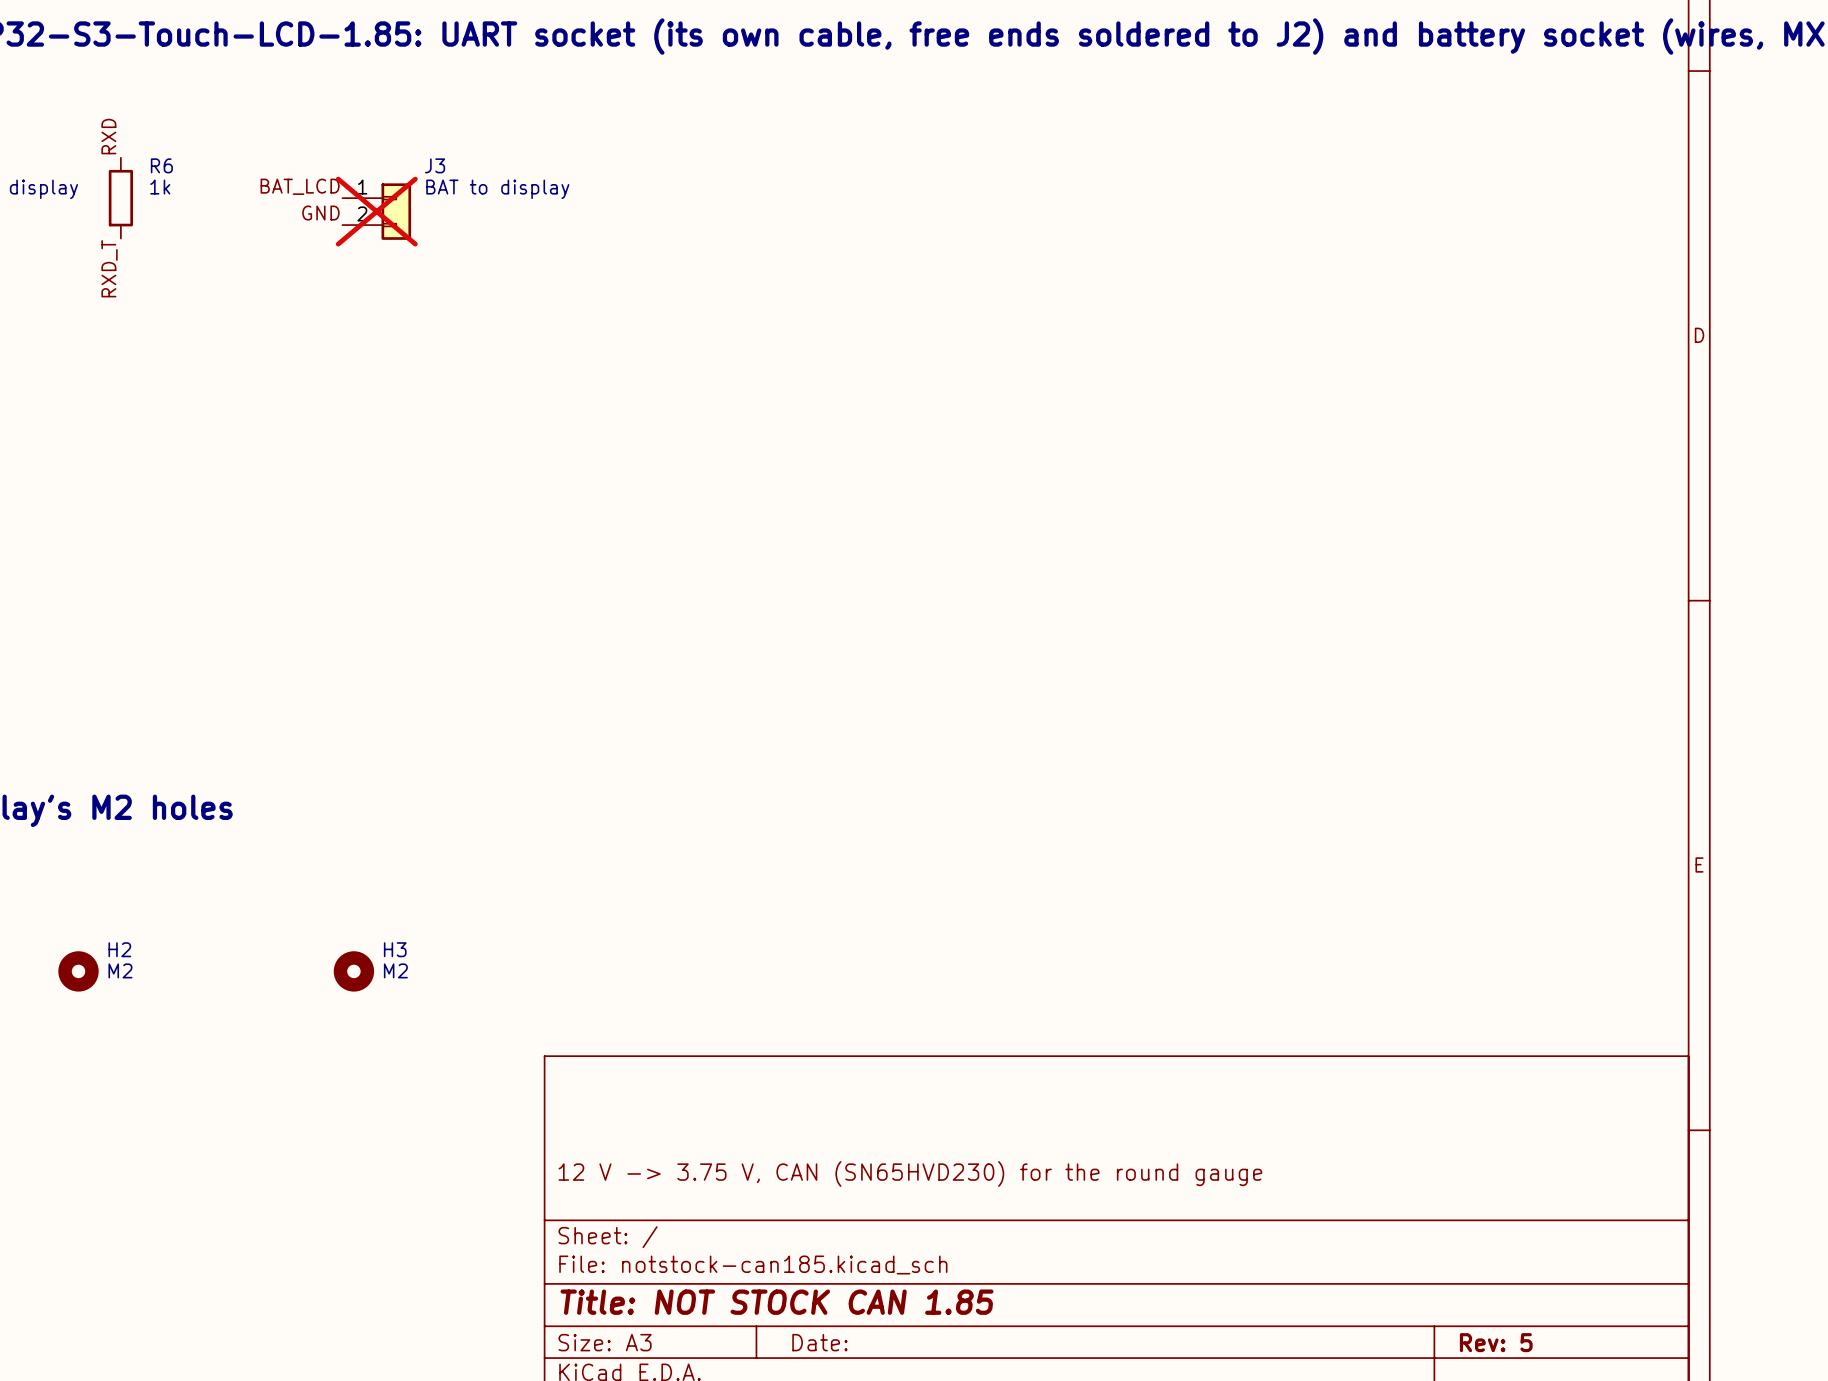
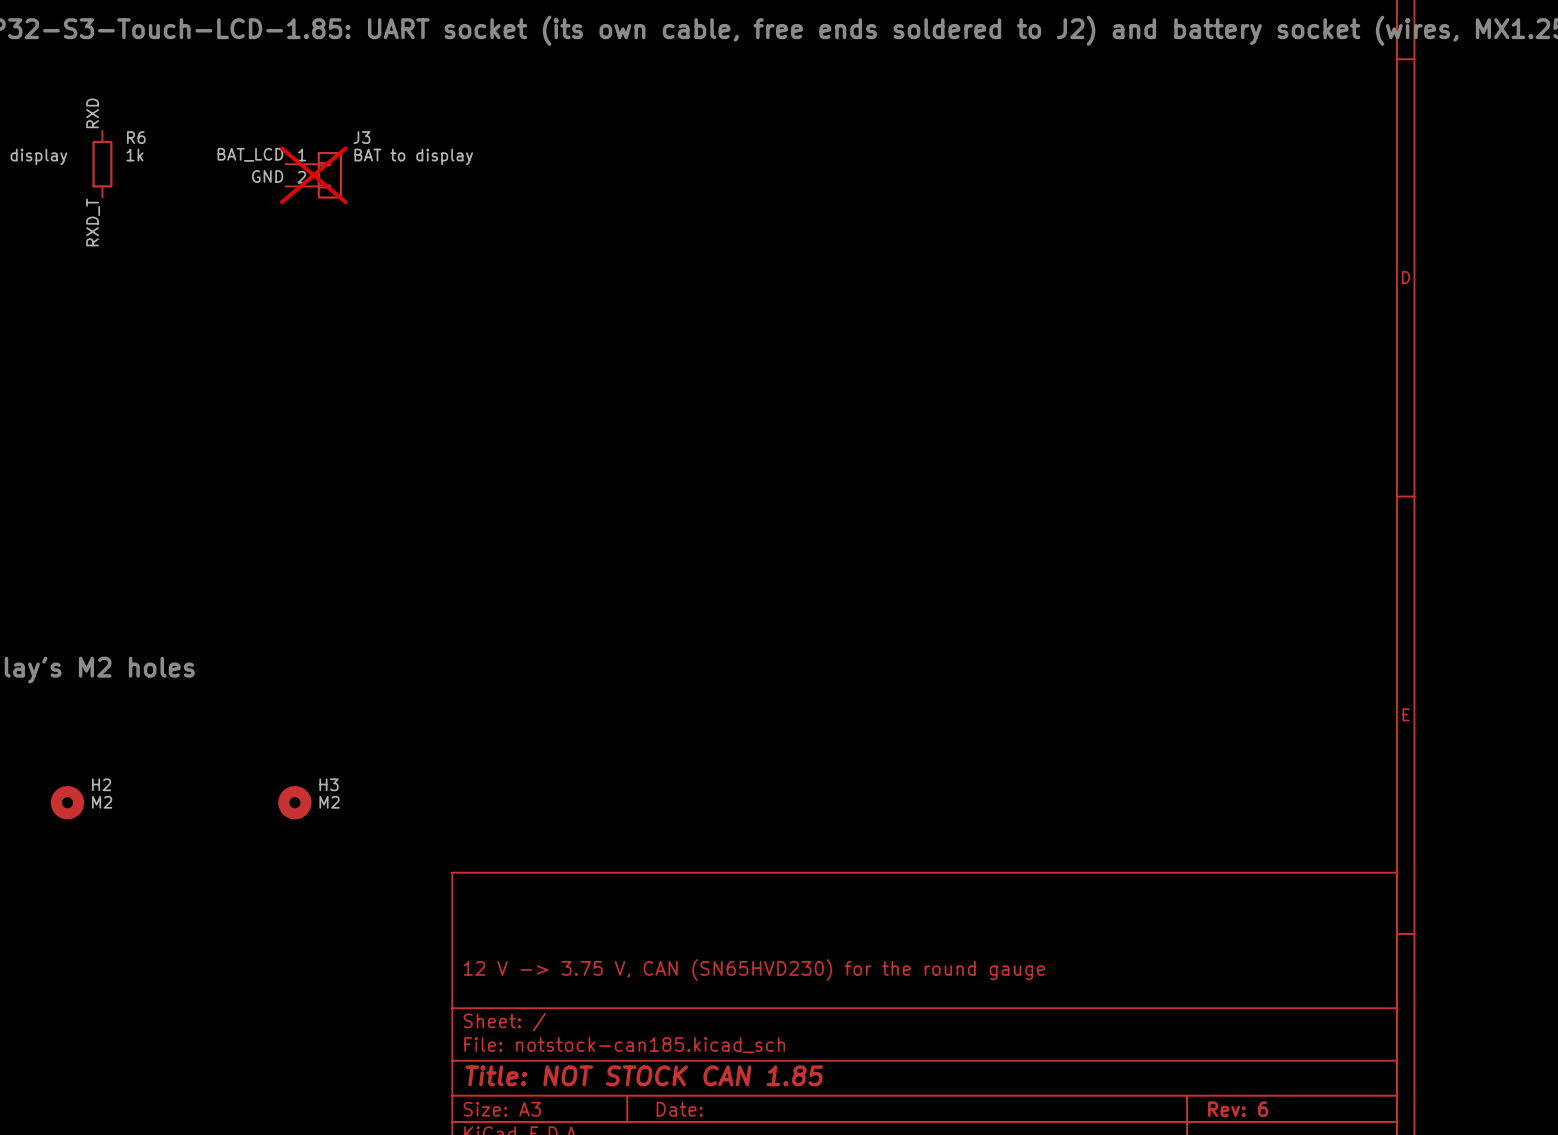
title block: Rev: 5 (1496, 1342) -> Rev: 6 (1238, 1109)

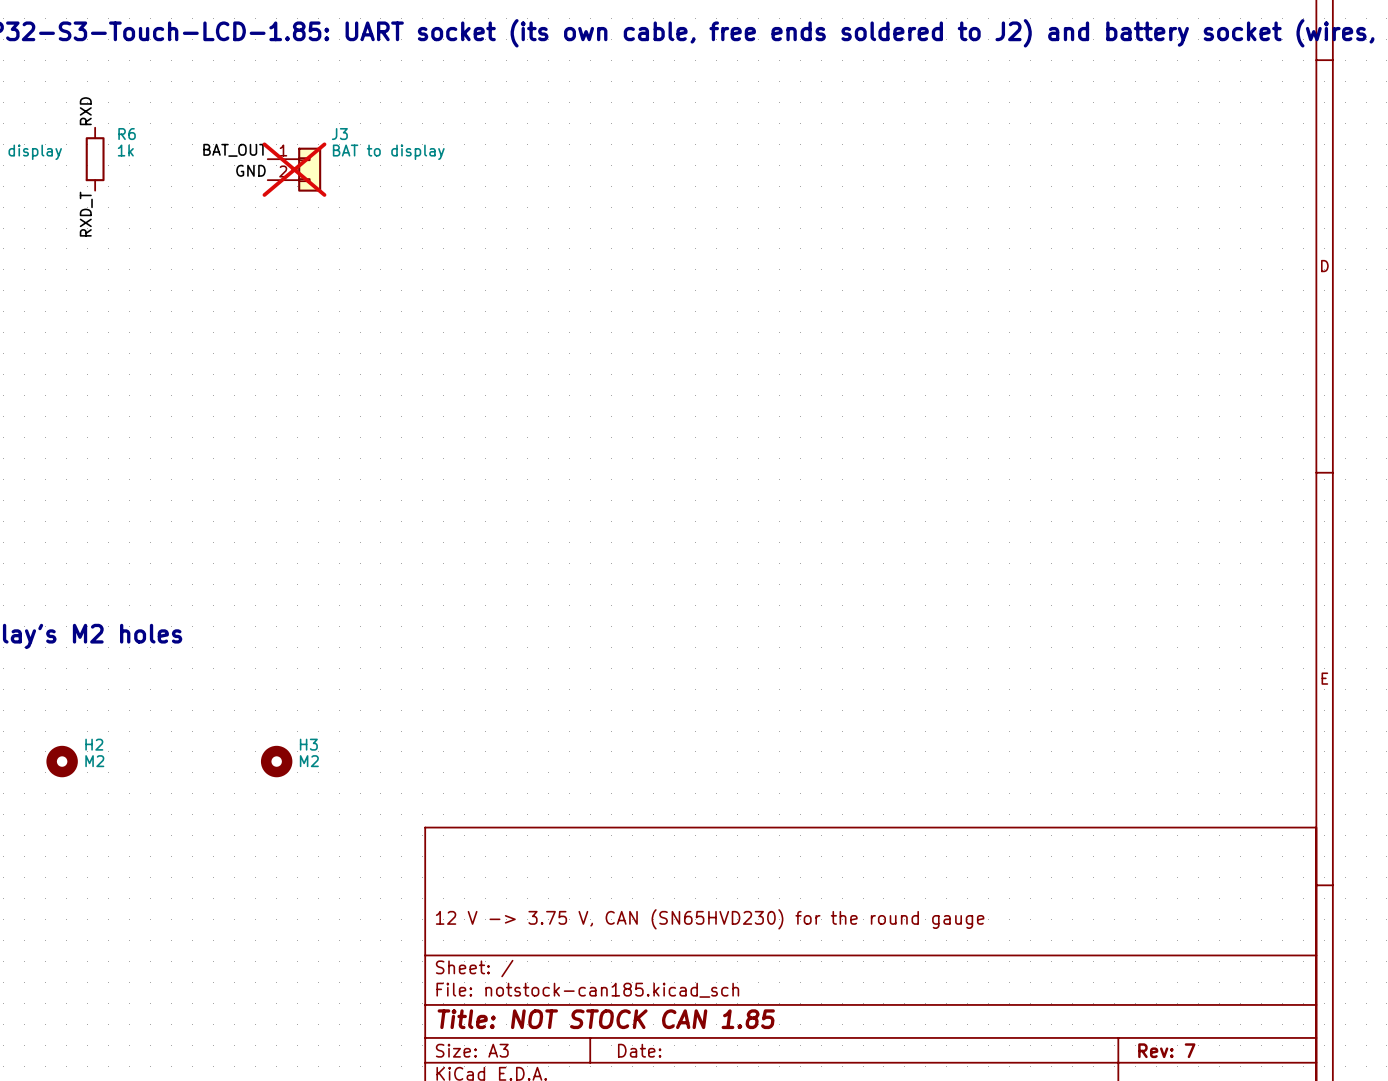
label: BAT_LCD (250, 154) -> BAT_OUT (234, 150)
title block: Rev: 6 (1238, 1109) -> Rev: 7 (1166, 1050)

